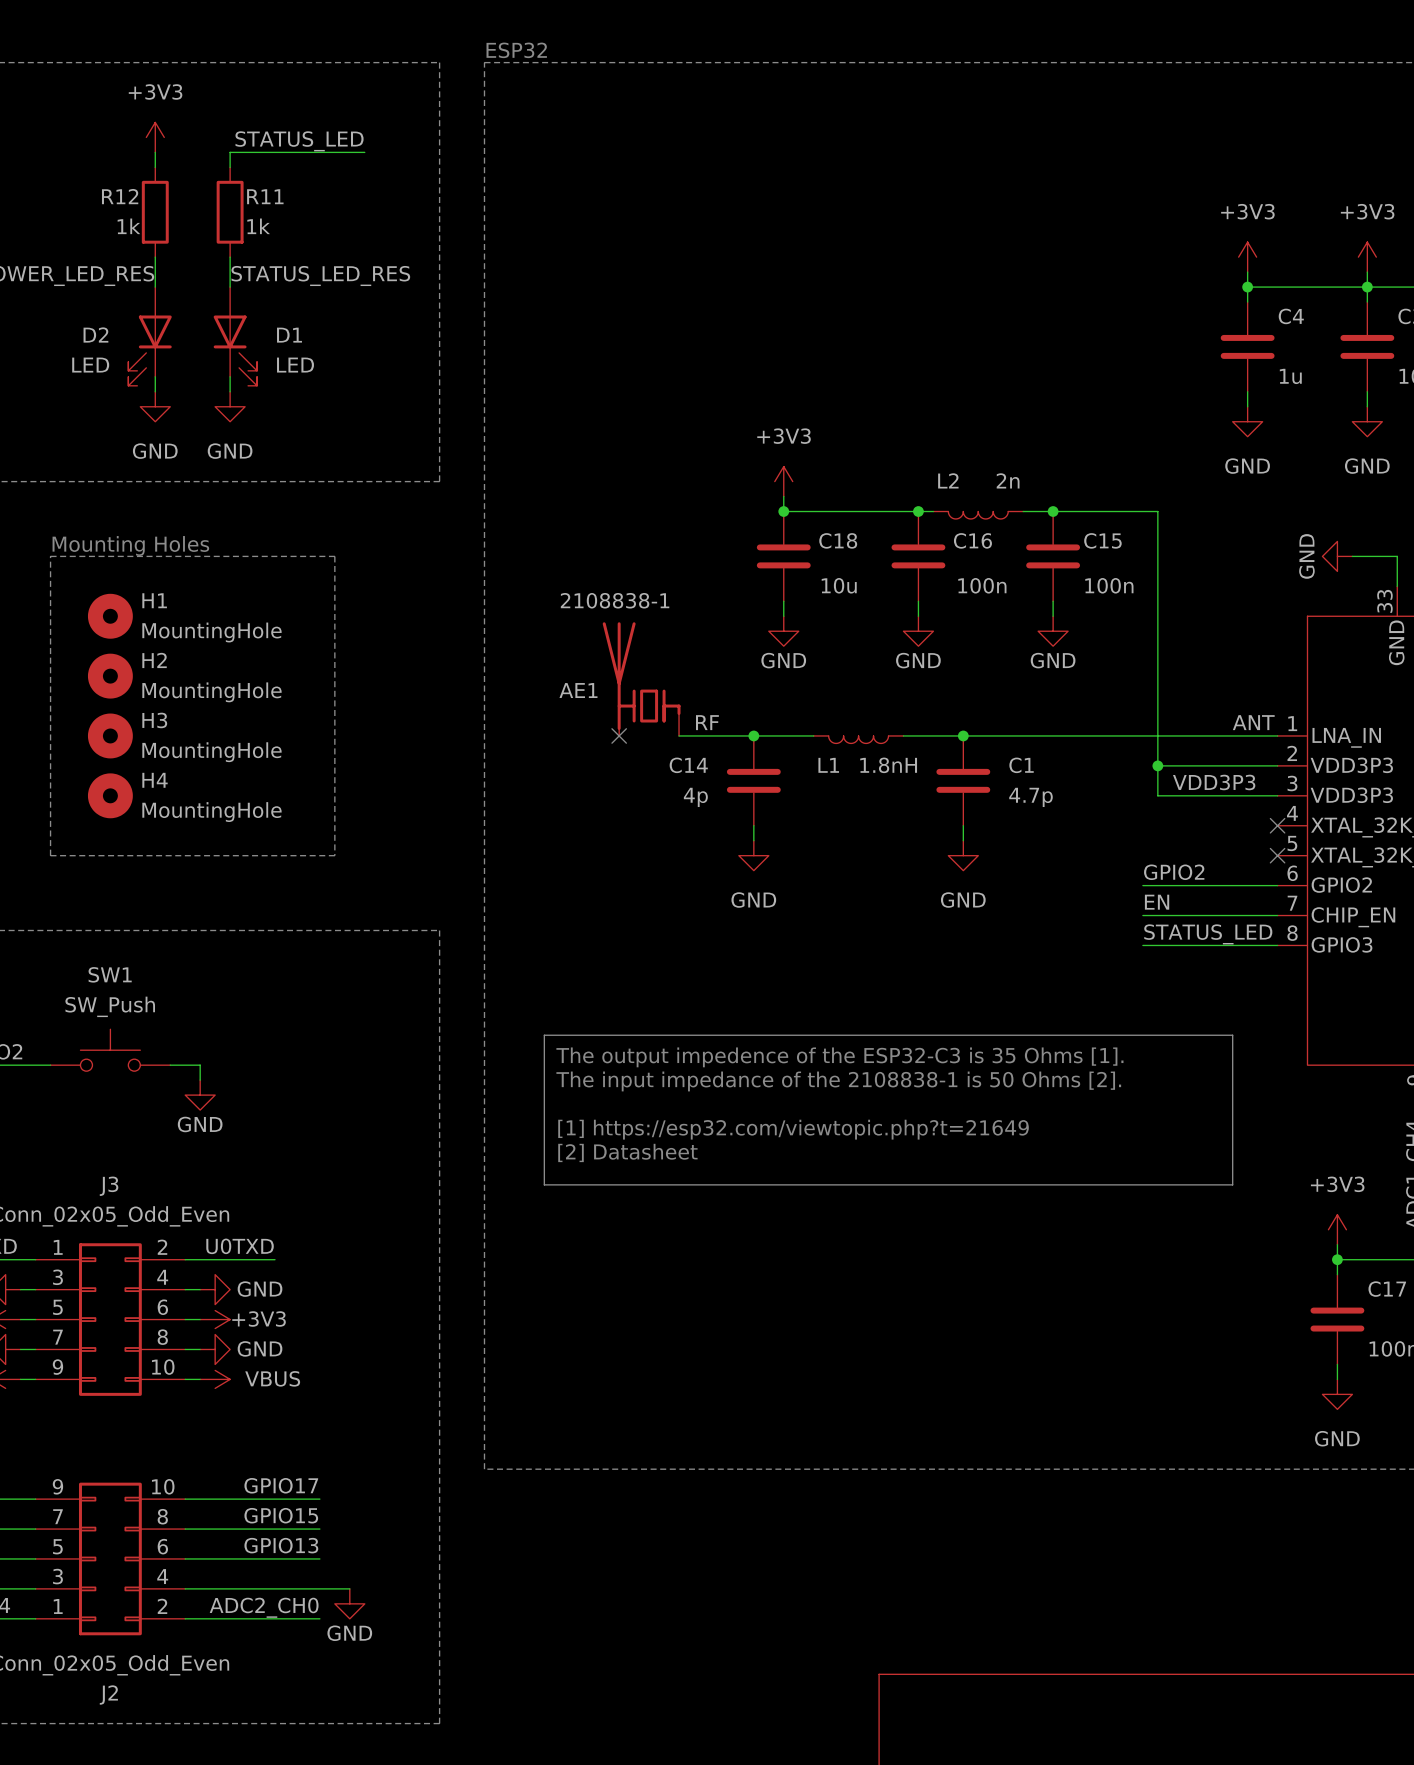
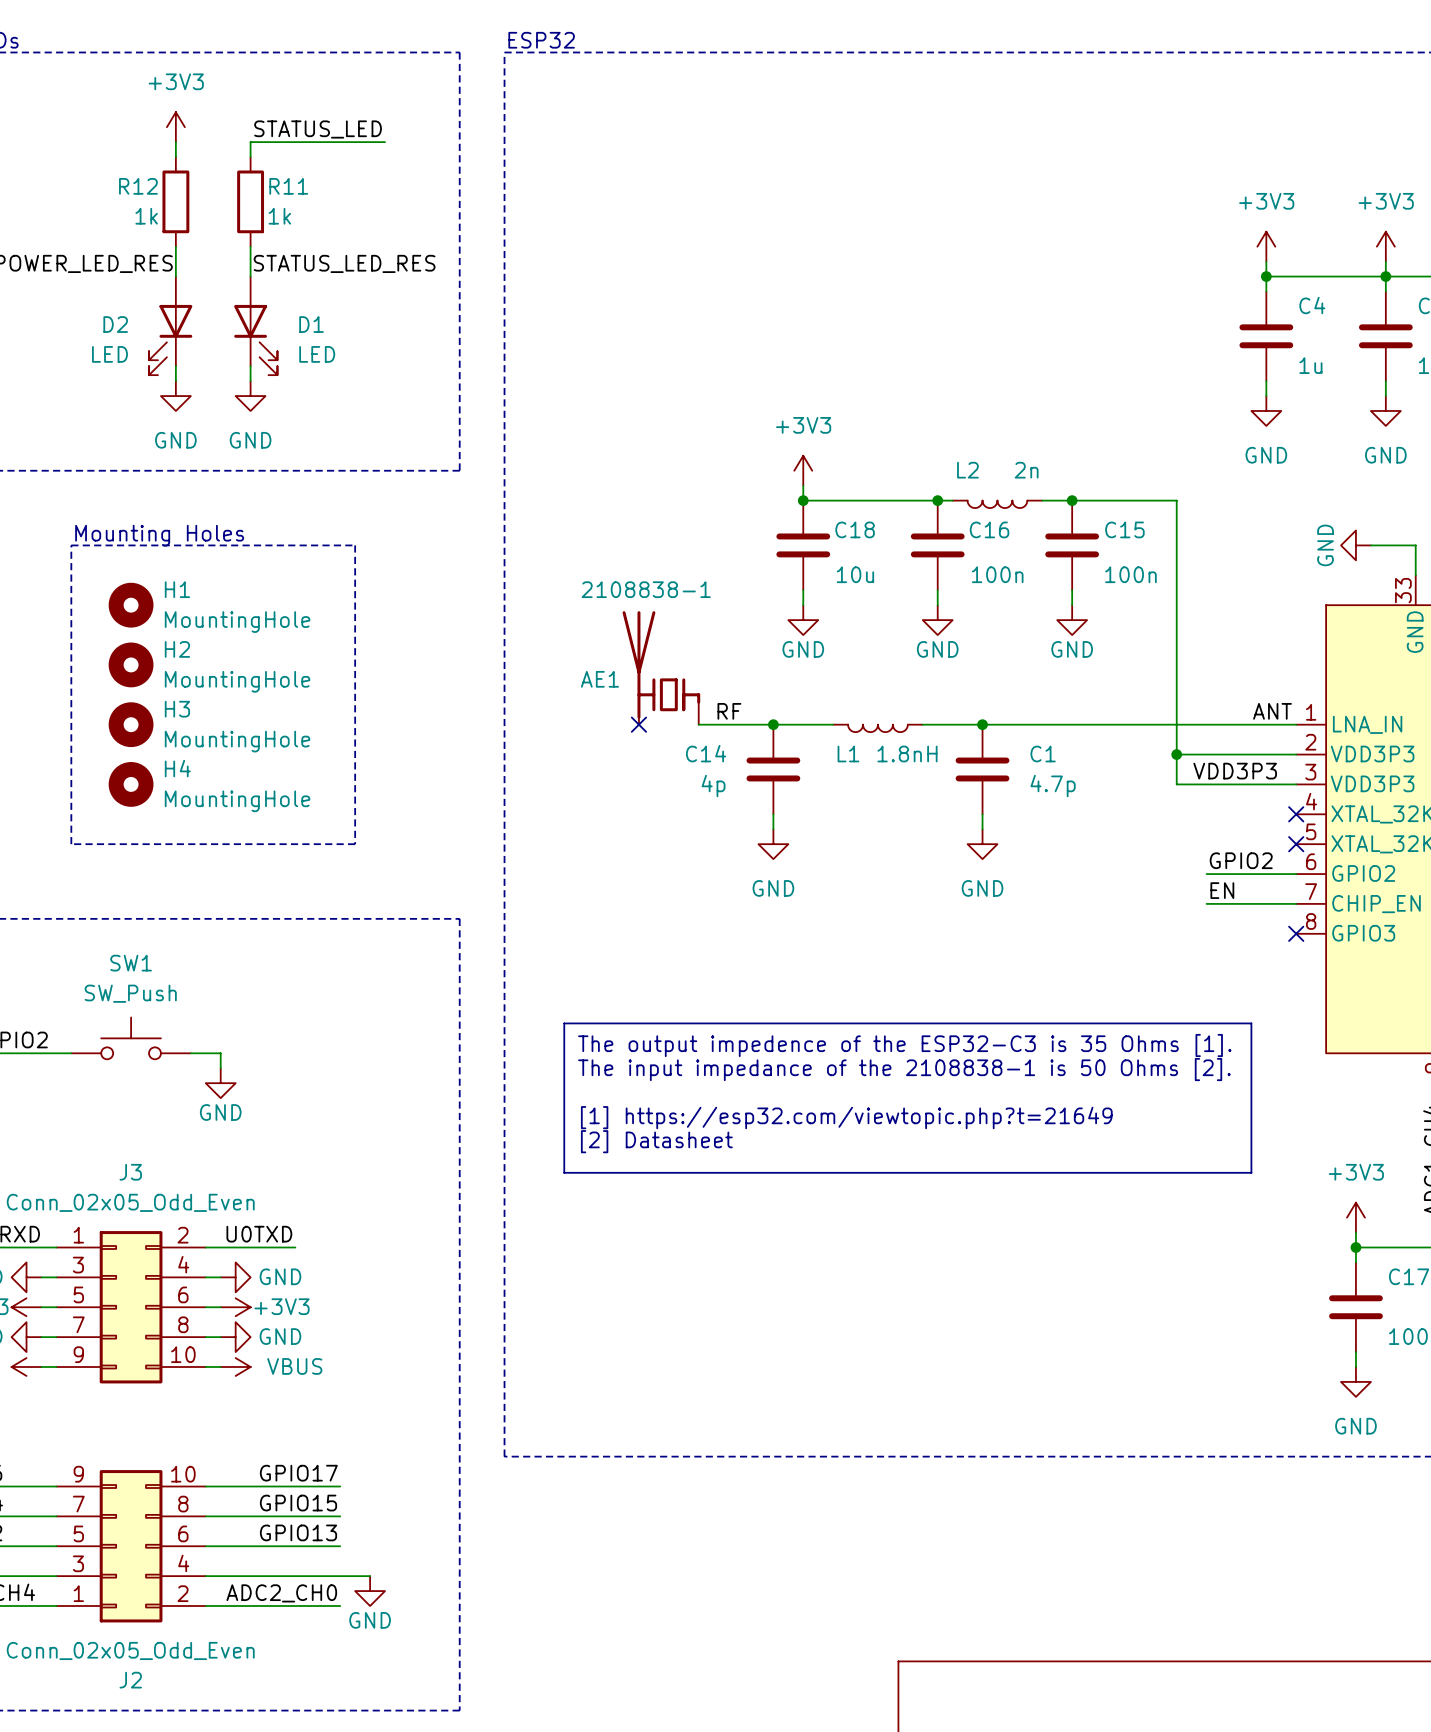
label position: GPIO2 (1174, 872) -> GPIO2 (1241, 860)
wire: (1142, 885) (1187, 885) -> none
label position: EN (1157, 902) -> EN (1222, 890)
wire: (1142, 915) (1187, 915) -> none
label: STATUS_LED (1208, 934) -> none
wire: (1142, 945) (1277, 945) -> none
no-connect mark: none -> (1296, 933)

